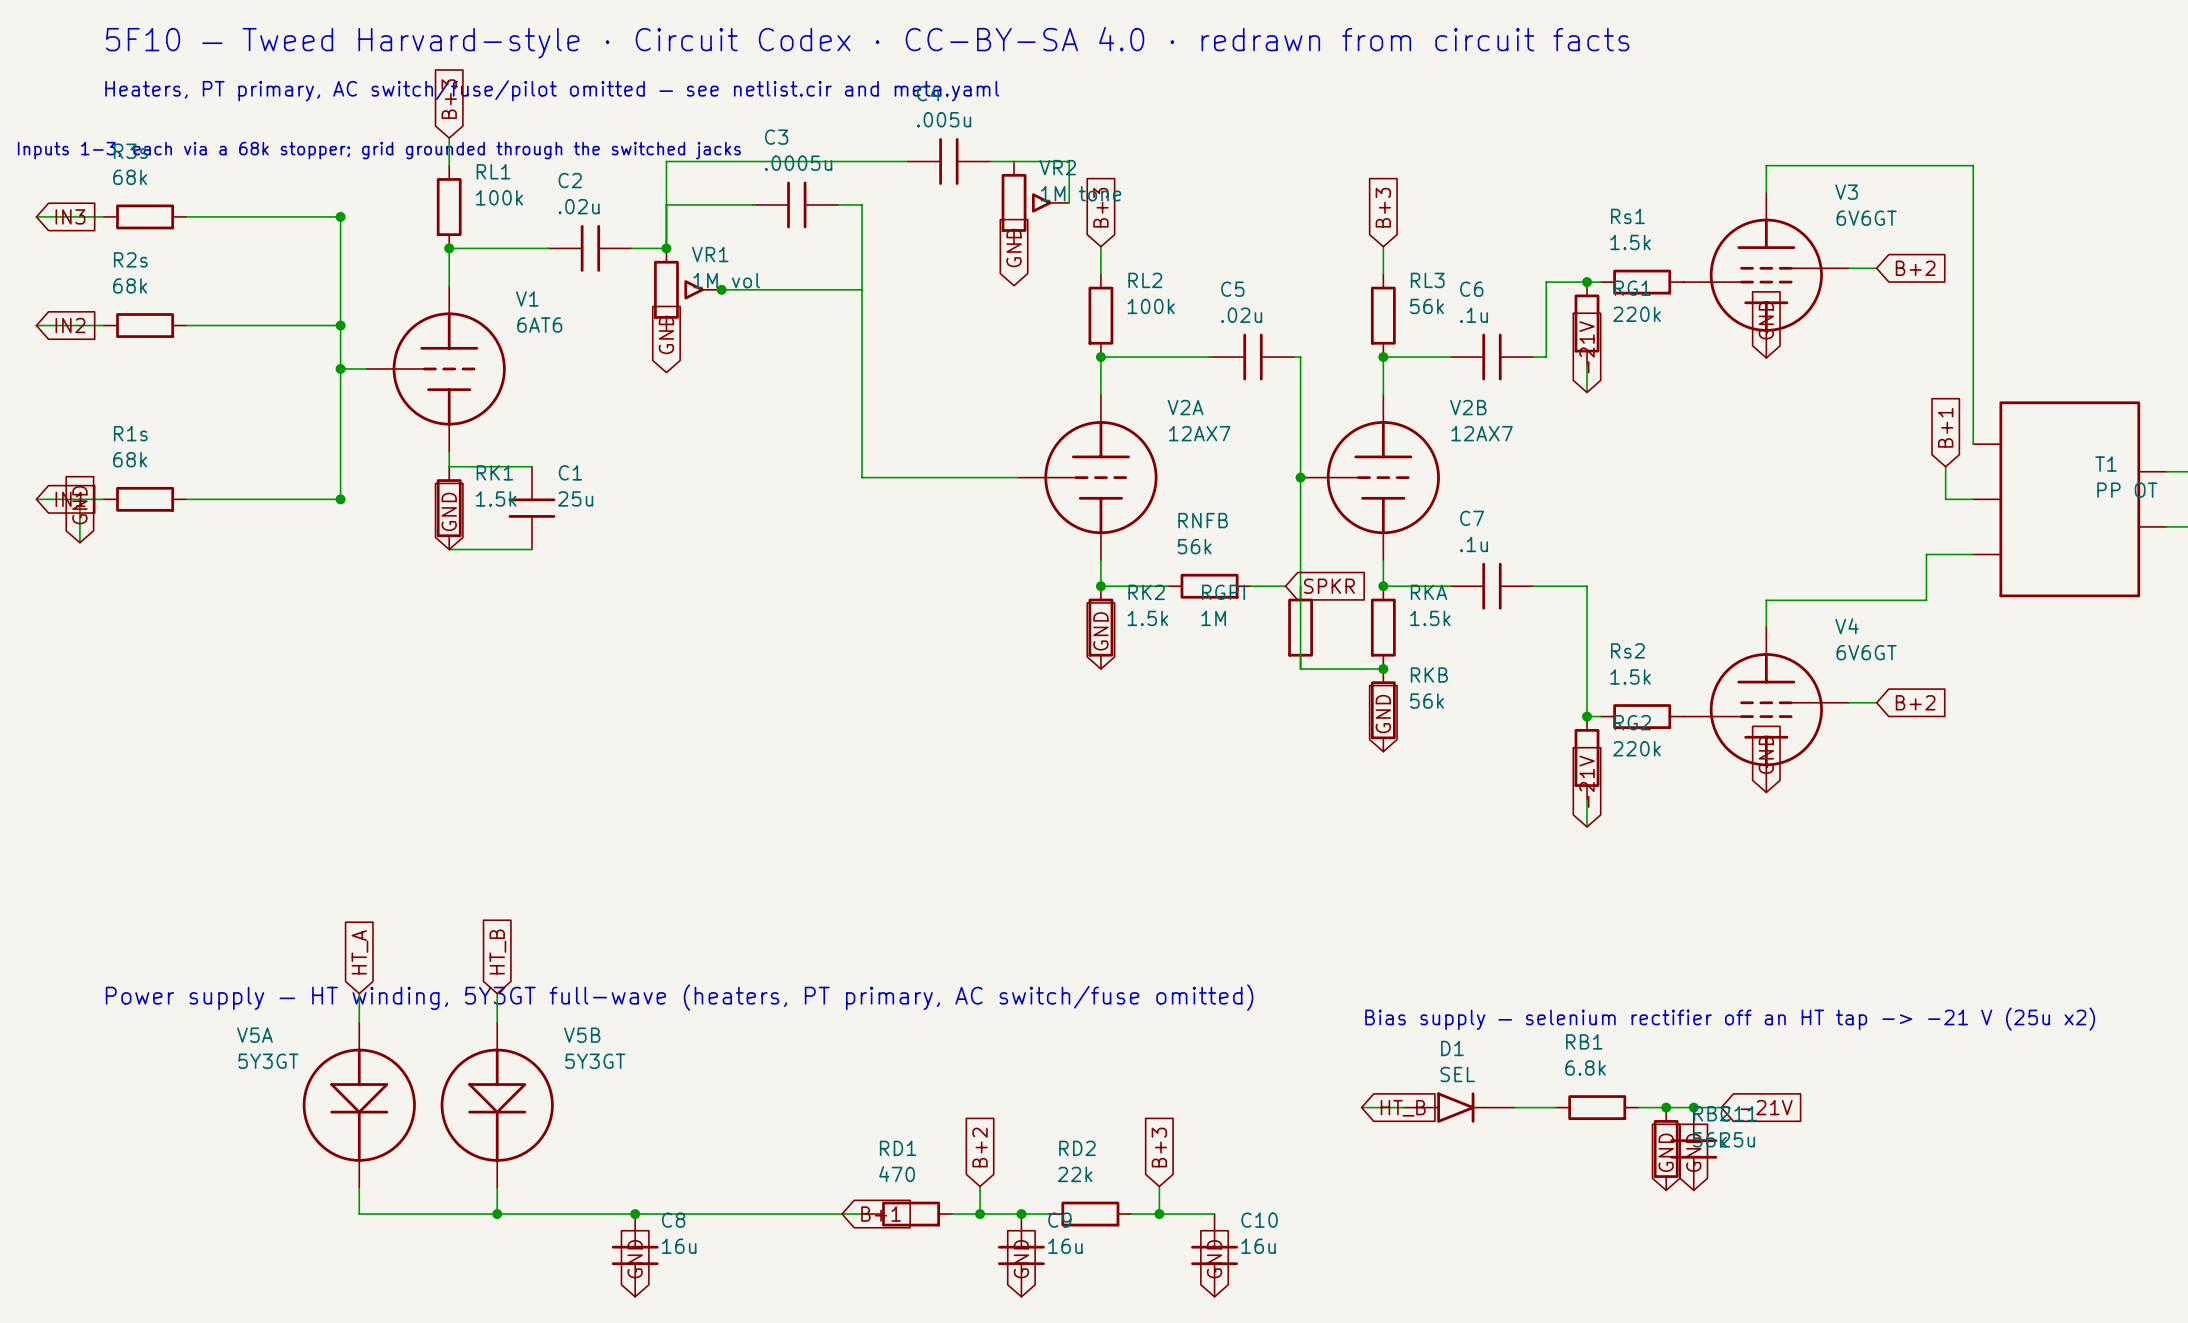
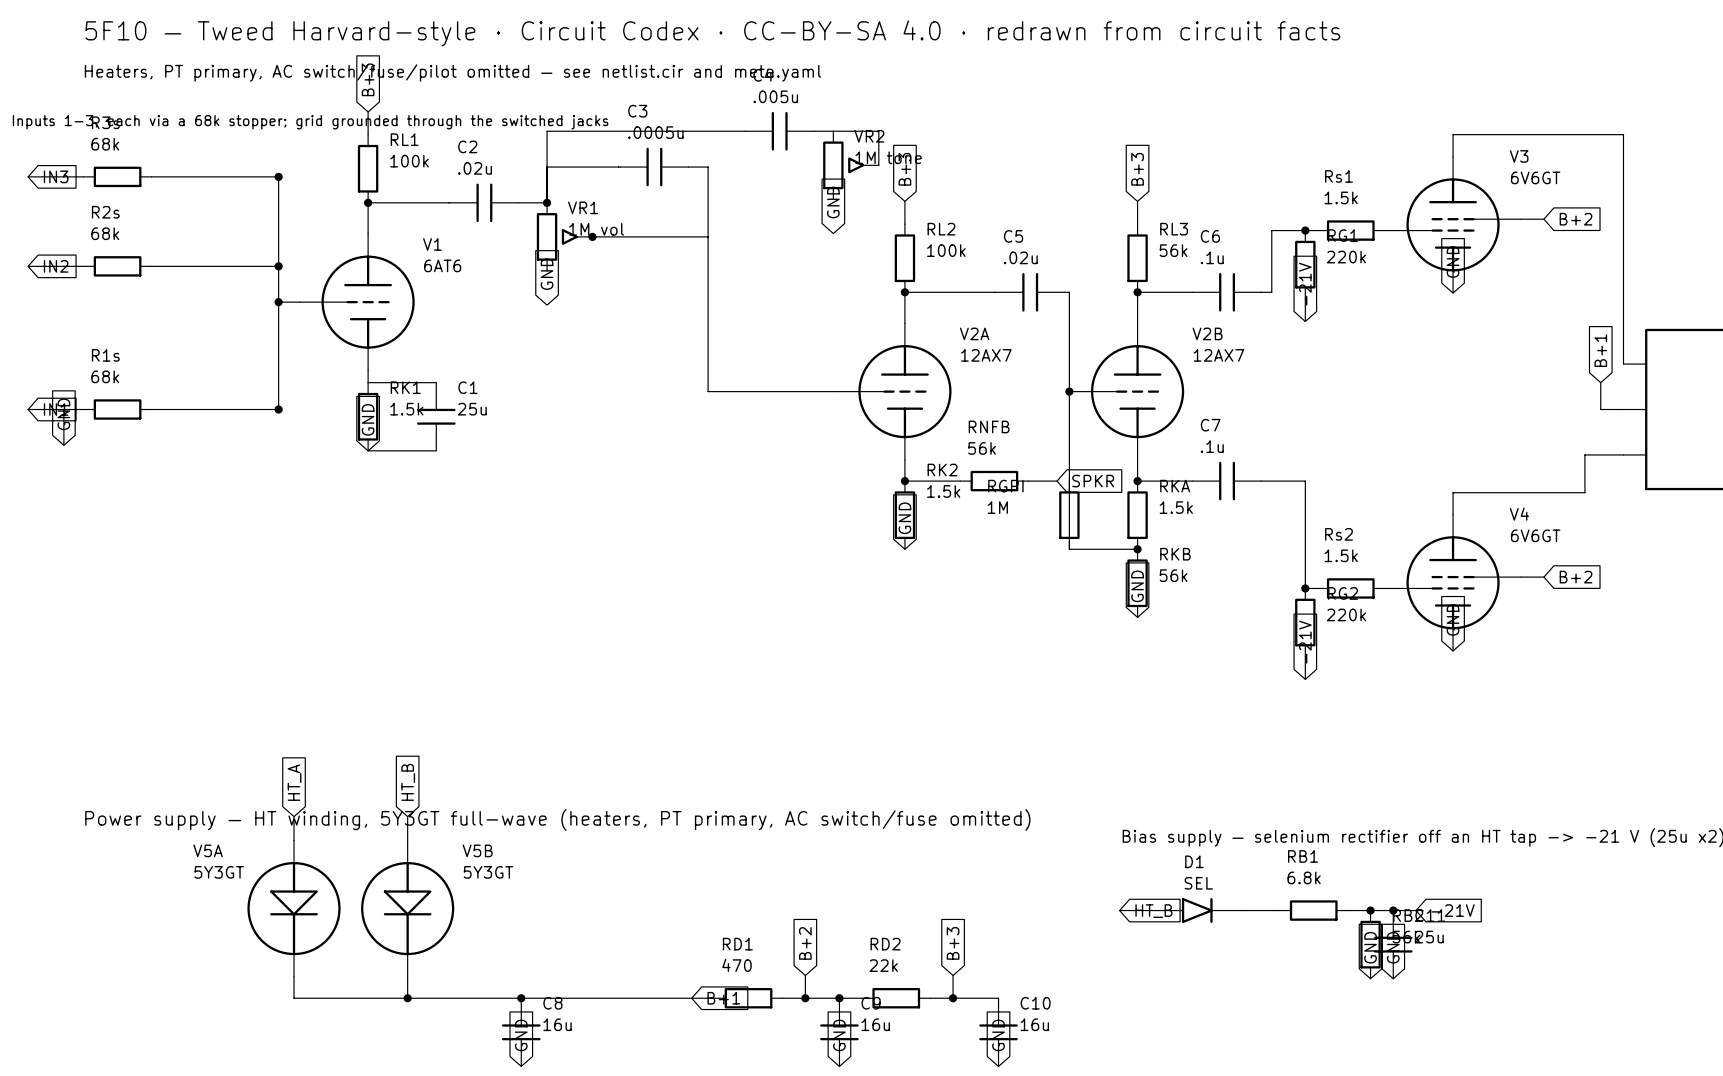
RK2 name position: RK2 (1146, 592) -> RK2 (942, 470)
RK2 value position: 1.5k (1147, 618) -> 1.5k (943, 491)

